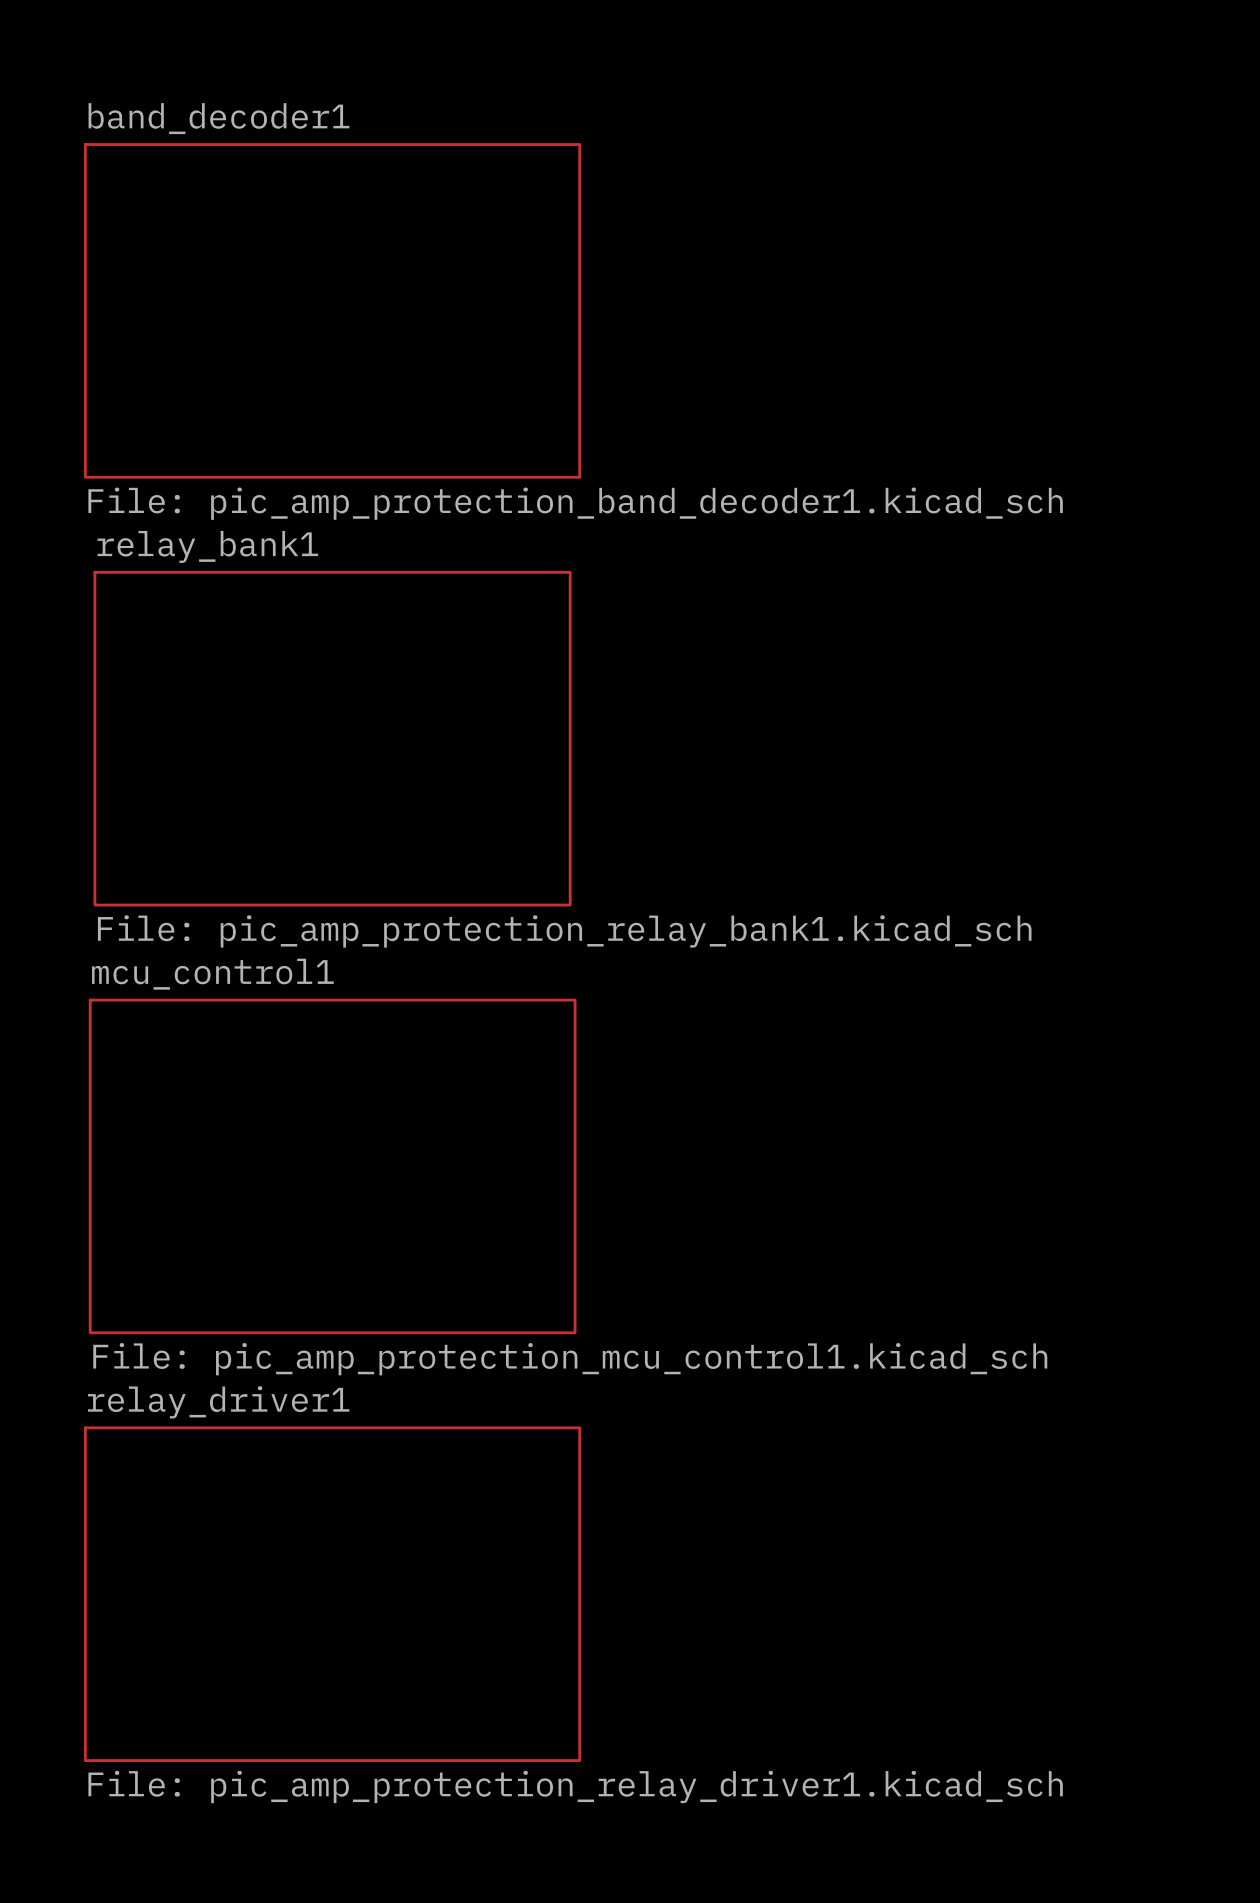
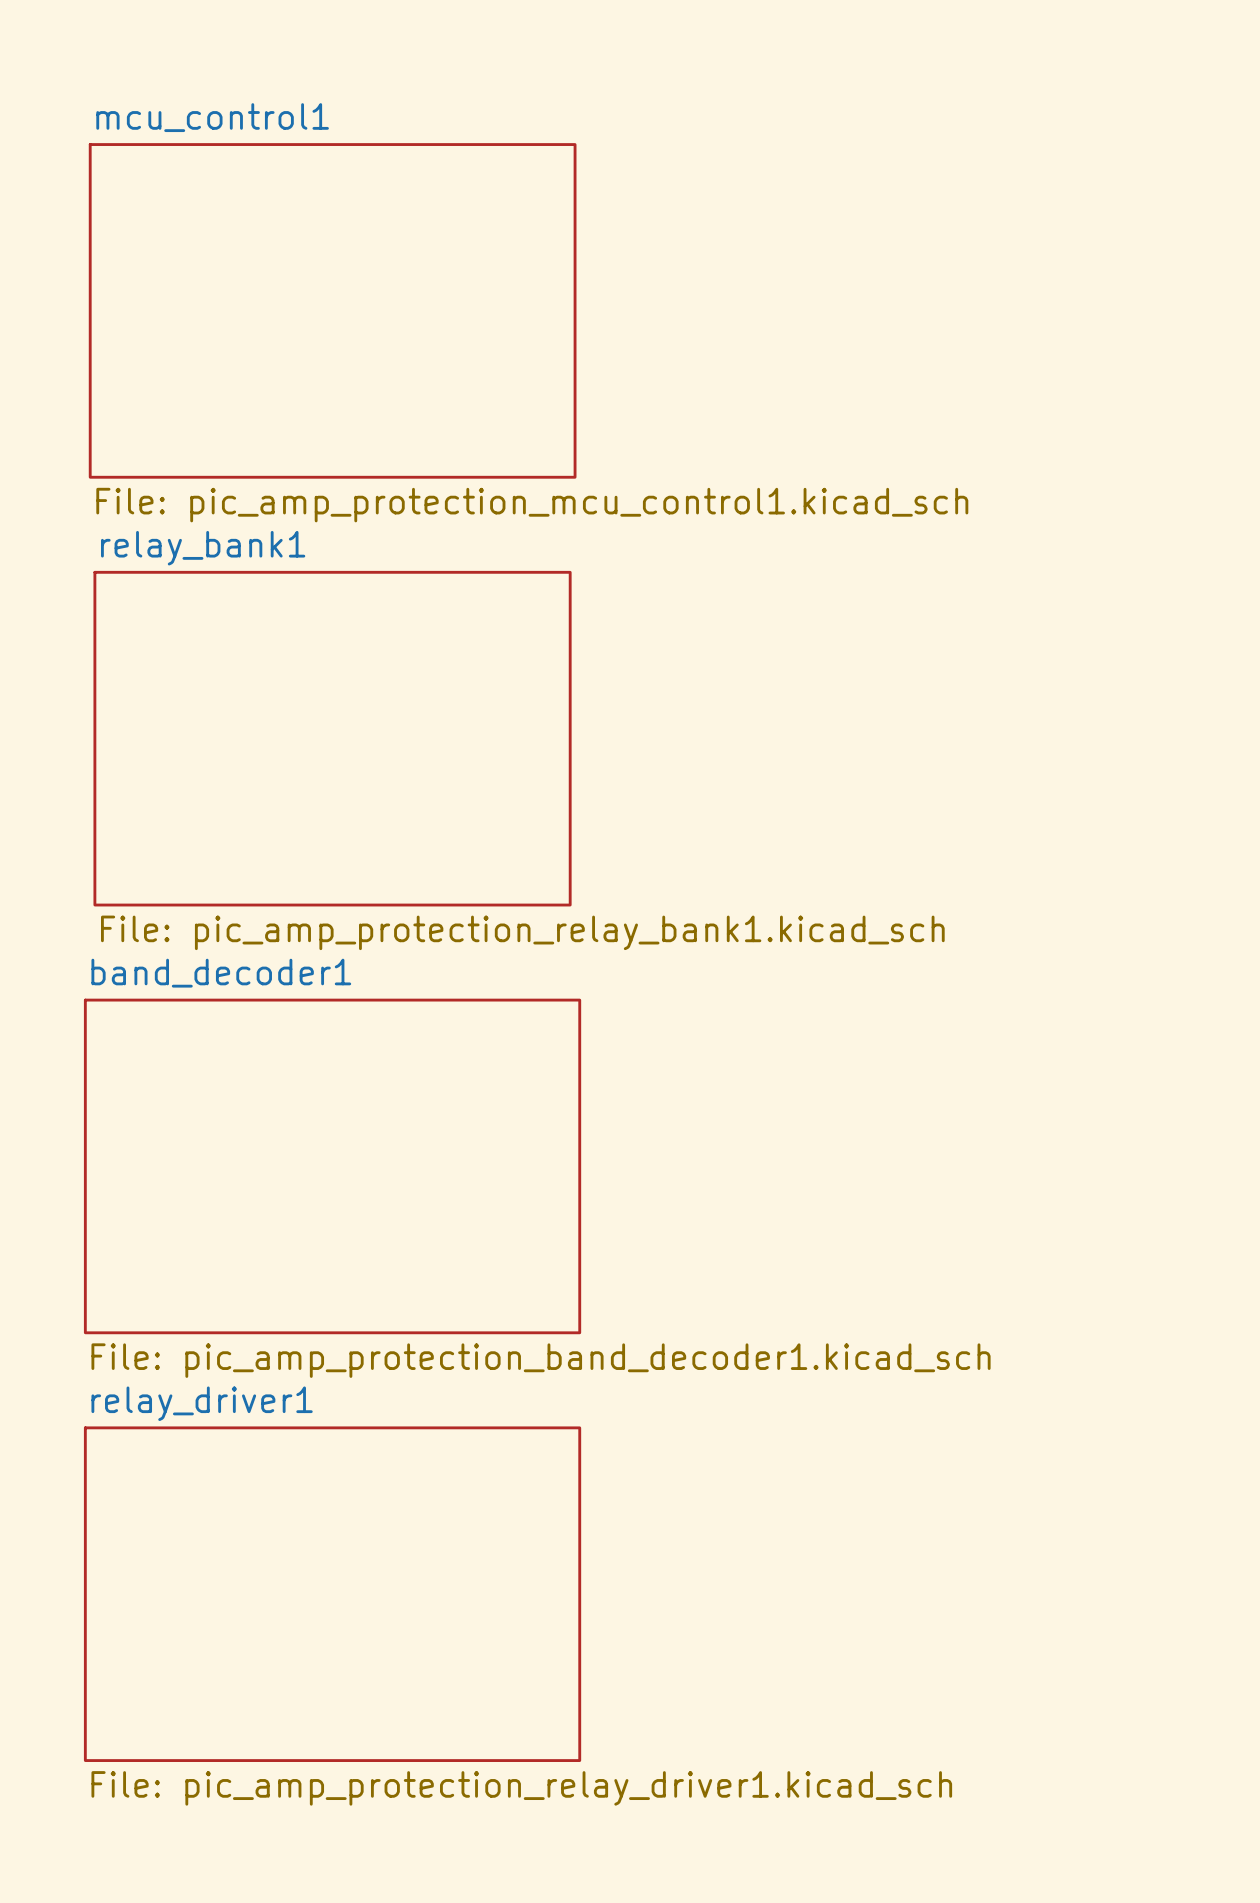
sheet band_decoder1 position: (332, 310) -> (332, 1166)
sheet mcu_control1 position: (332, 1166) -> (332, 310)

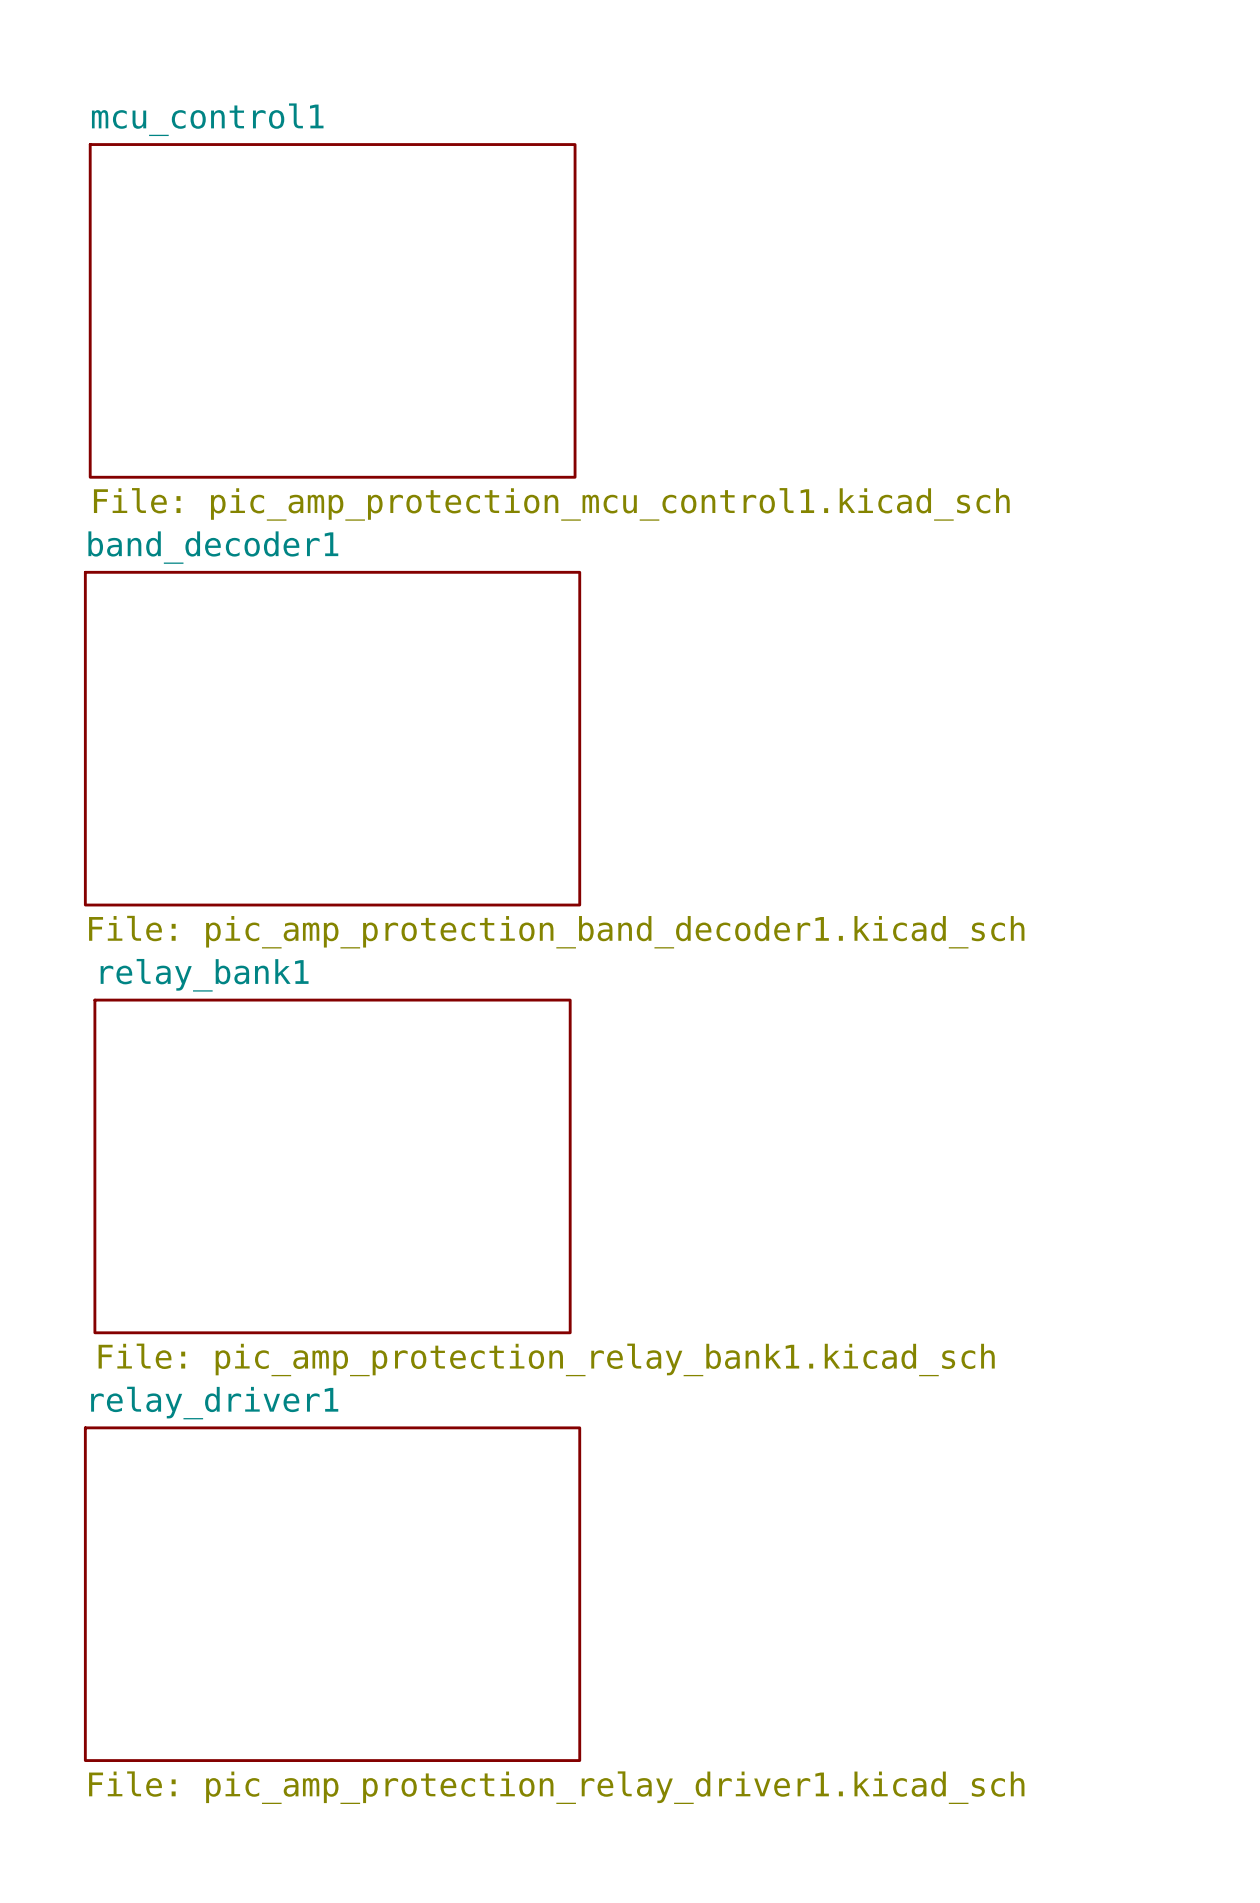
sheet relay_bank1 position: (332, 738) -> (332, 1166)
sheet band_decoder1 position: (332, 1166) -> (332, 738)

